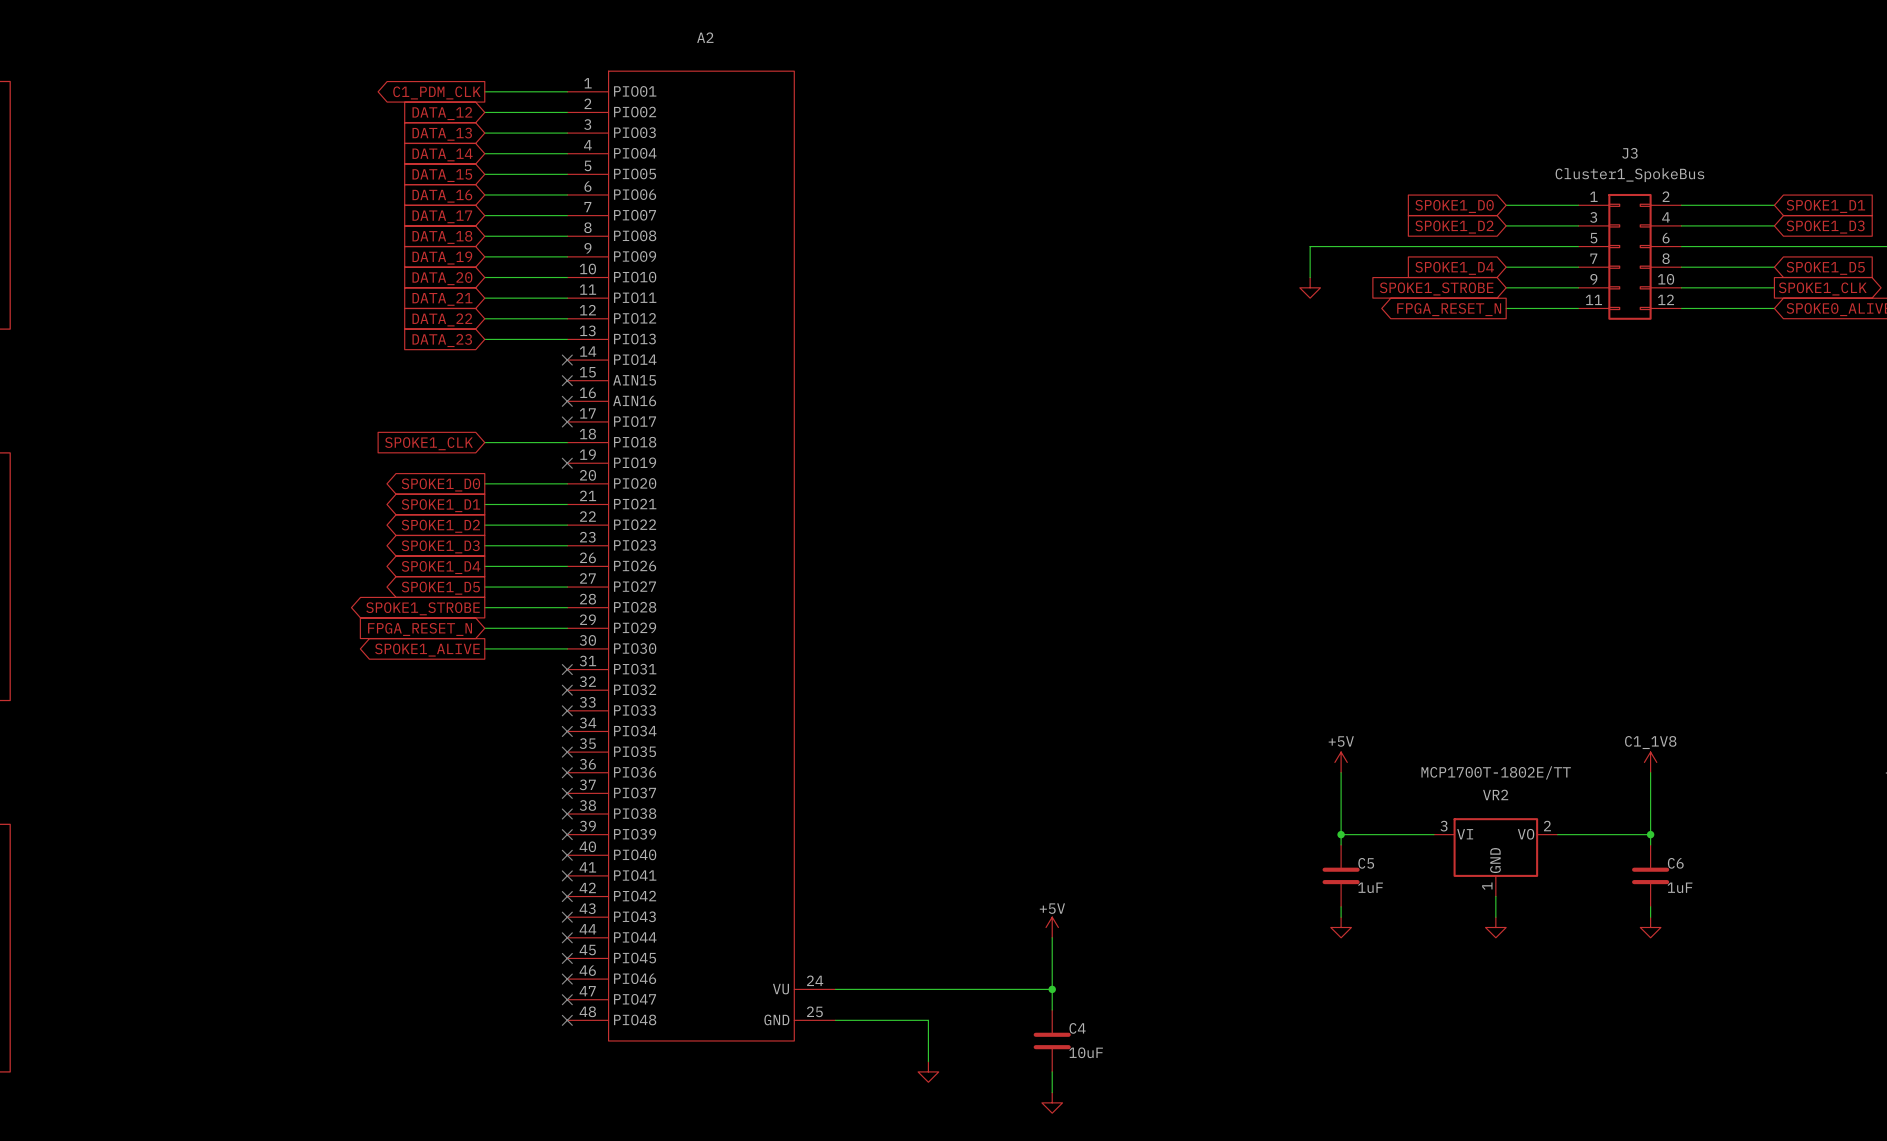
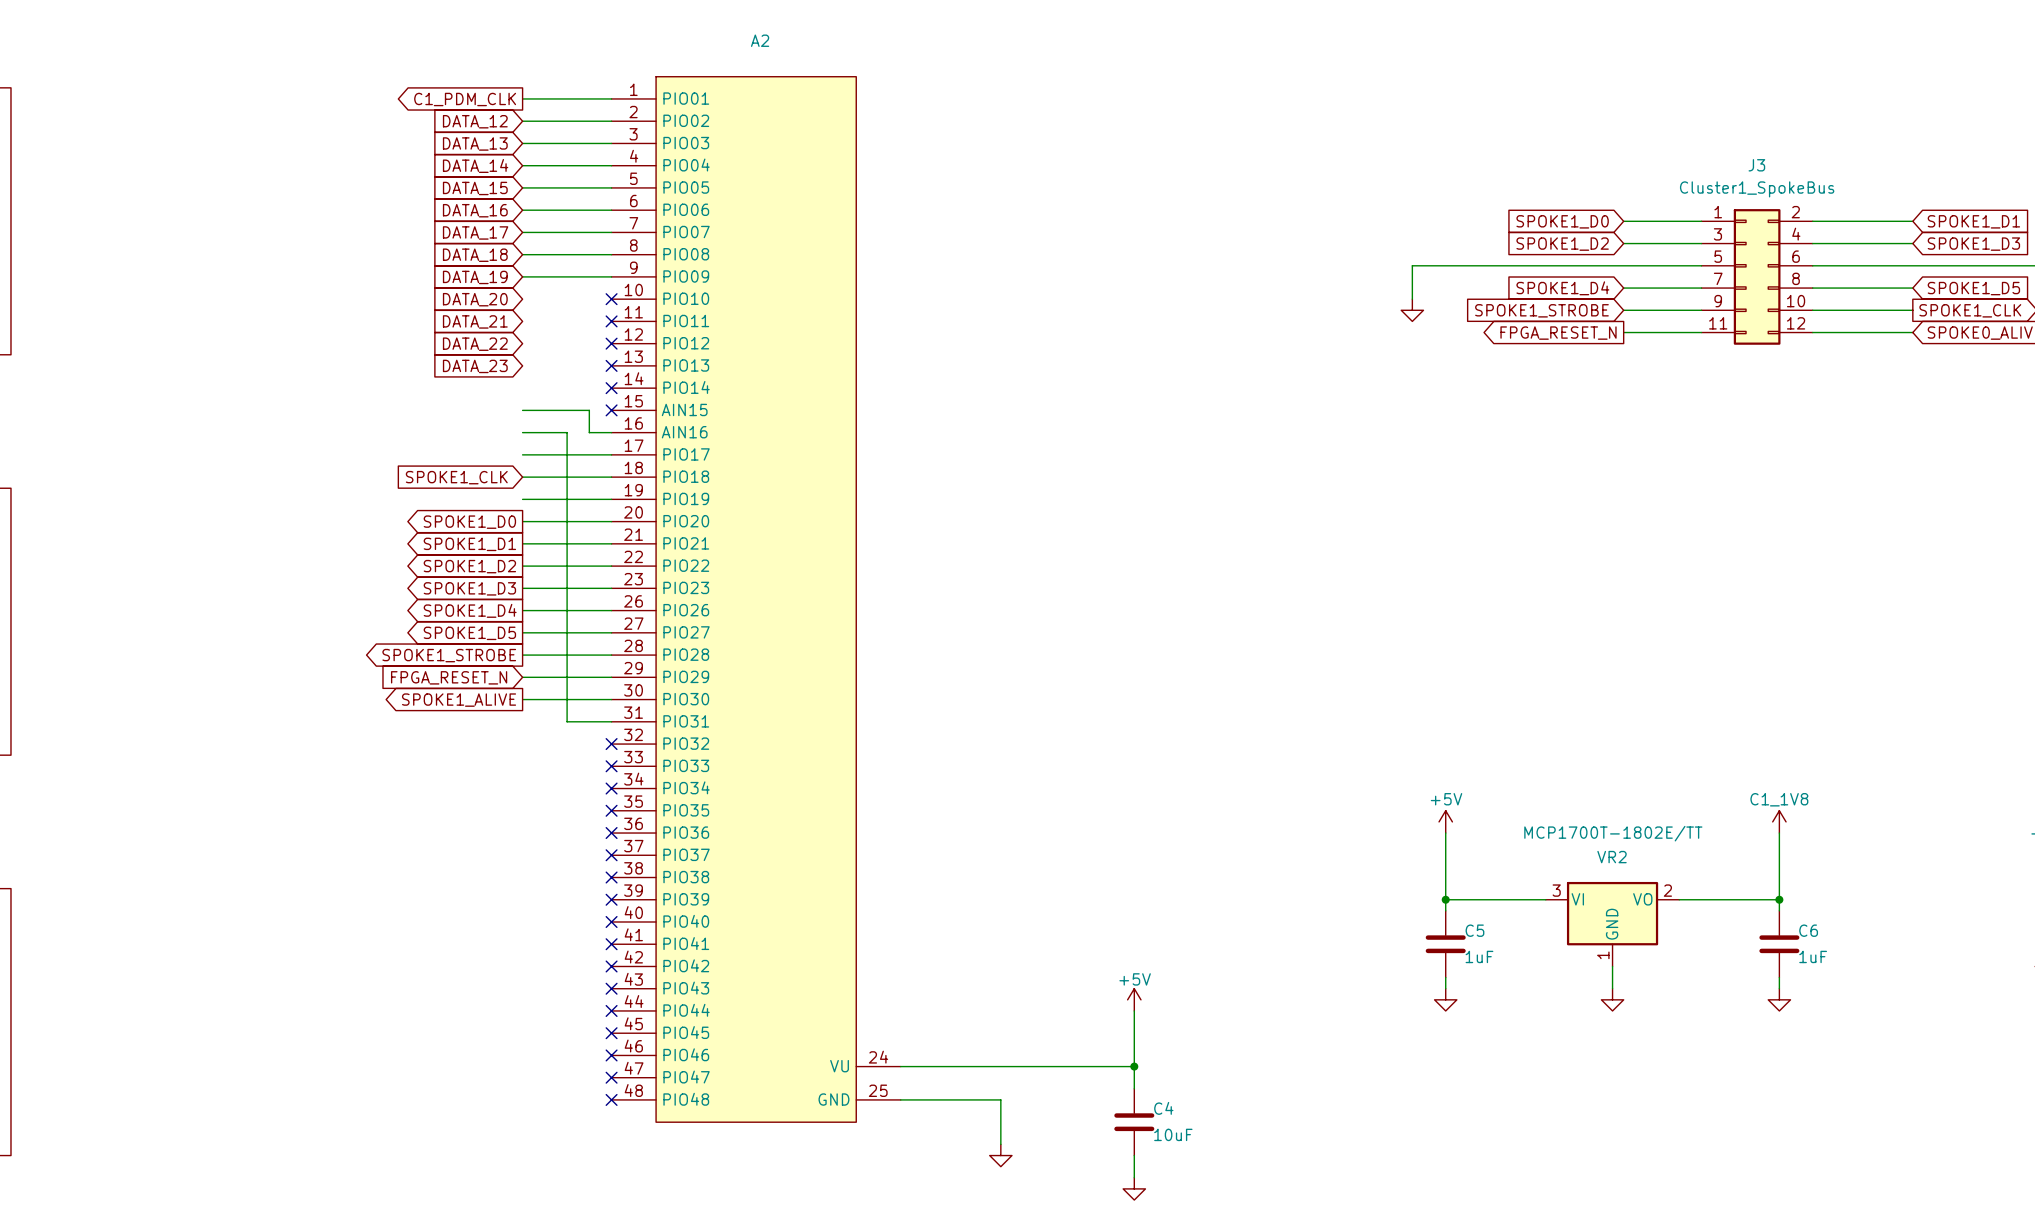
wire: (484, 277) (567, 277) -> none
no-connect mark: none -> (611, 299)
wire: (484, 298) (567, 298) -> (522, 454) (611, 454)
no-connect mark: none -> (611, 321)
wire: (484, 318) (567, 318) -> none
no-connect mark: none -> (611, 343)
wire: (484, 339) (567, 339) -> (522, 499) (611, 499)
no-connect mark: none -> (611, 365)
wire: none -> (522, 410) (589, 410) (589, 432) (611, 432)
wire: none -> (522, 432) (567, 432) (567, 721) (611, 721)
no-connect mark: (567, 401) -> none
no-connect mark: (567, 421) -> none
no-connect mark: (567, 463) -> none
no-connect mark: (567, 669) -> none

